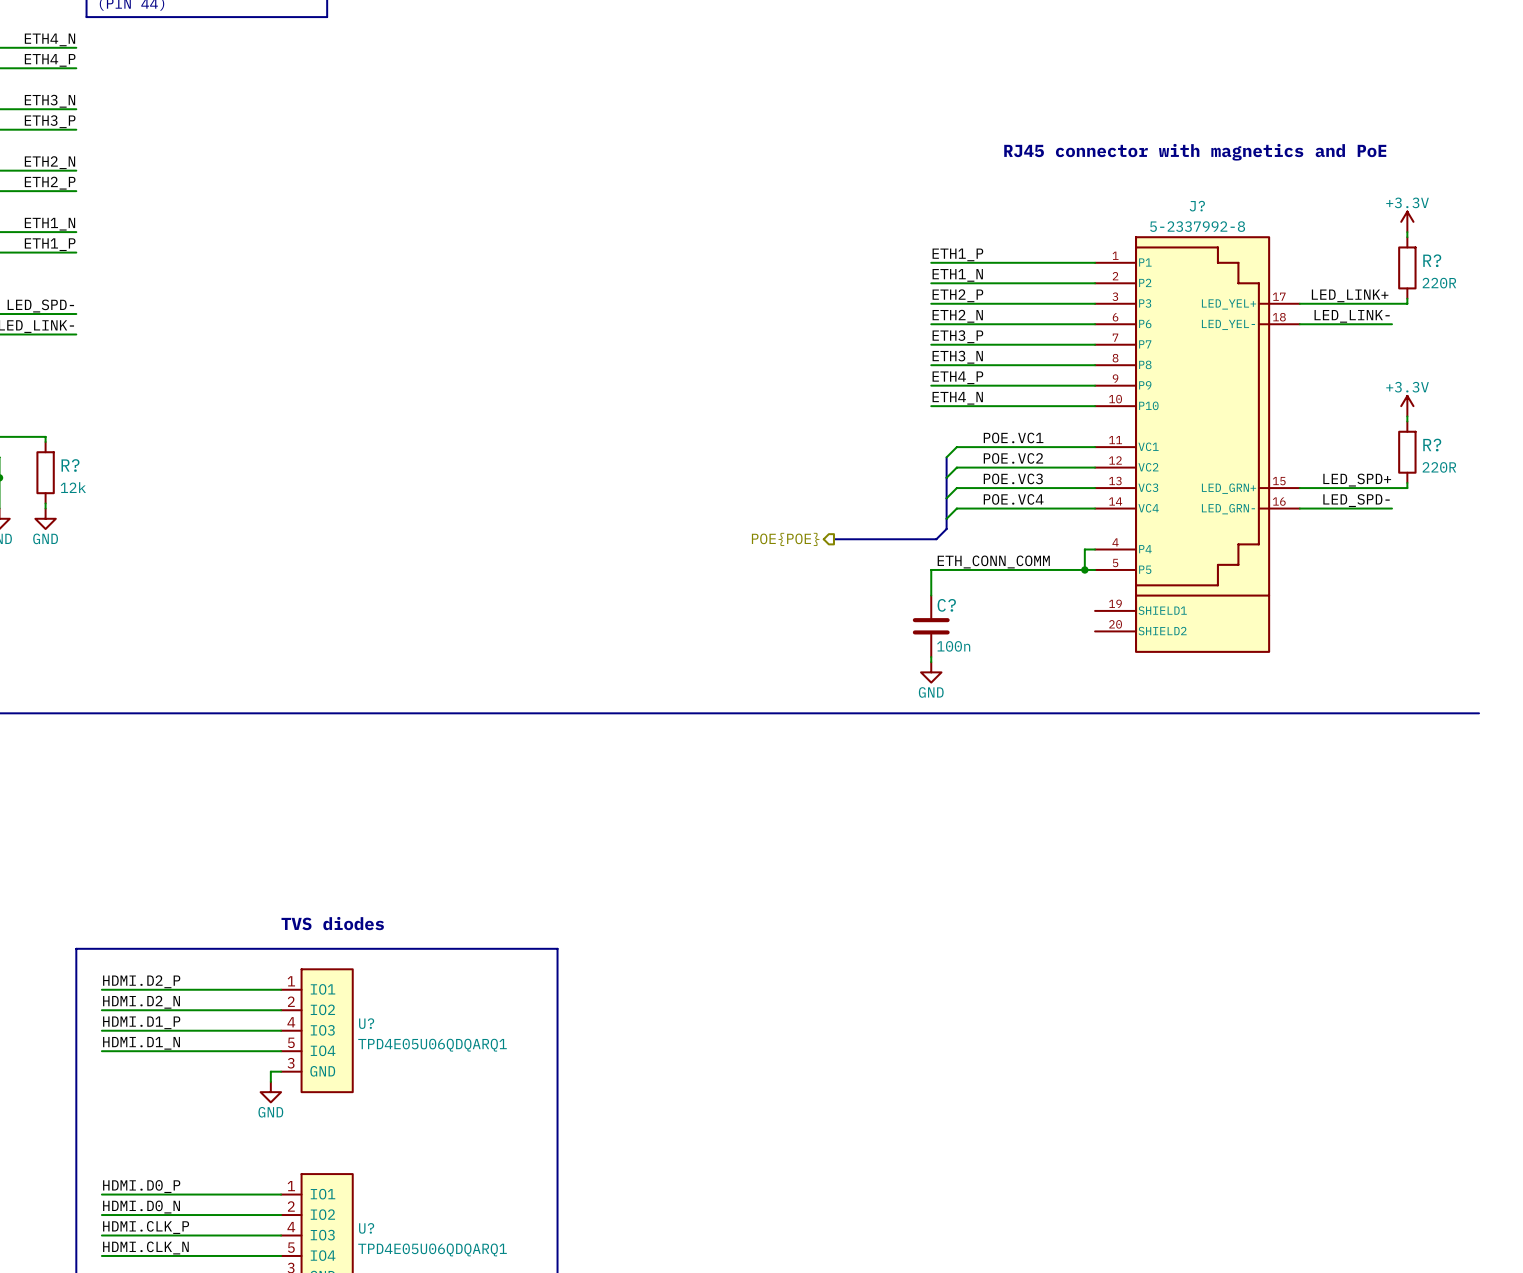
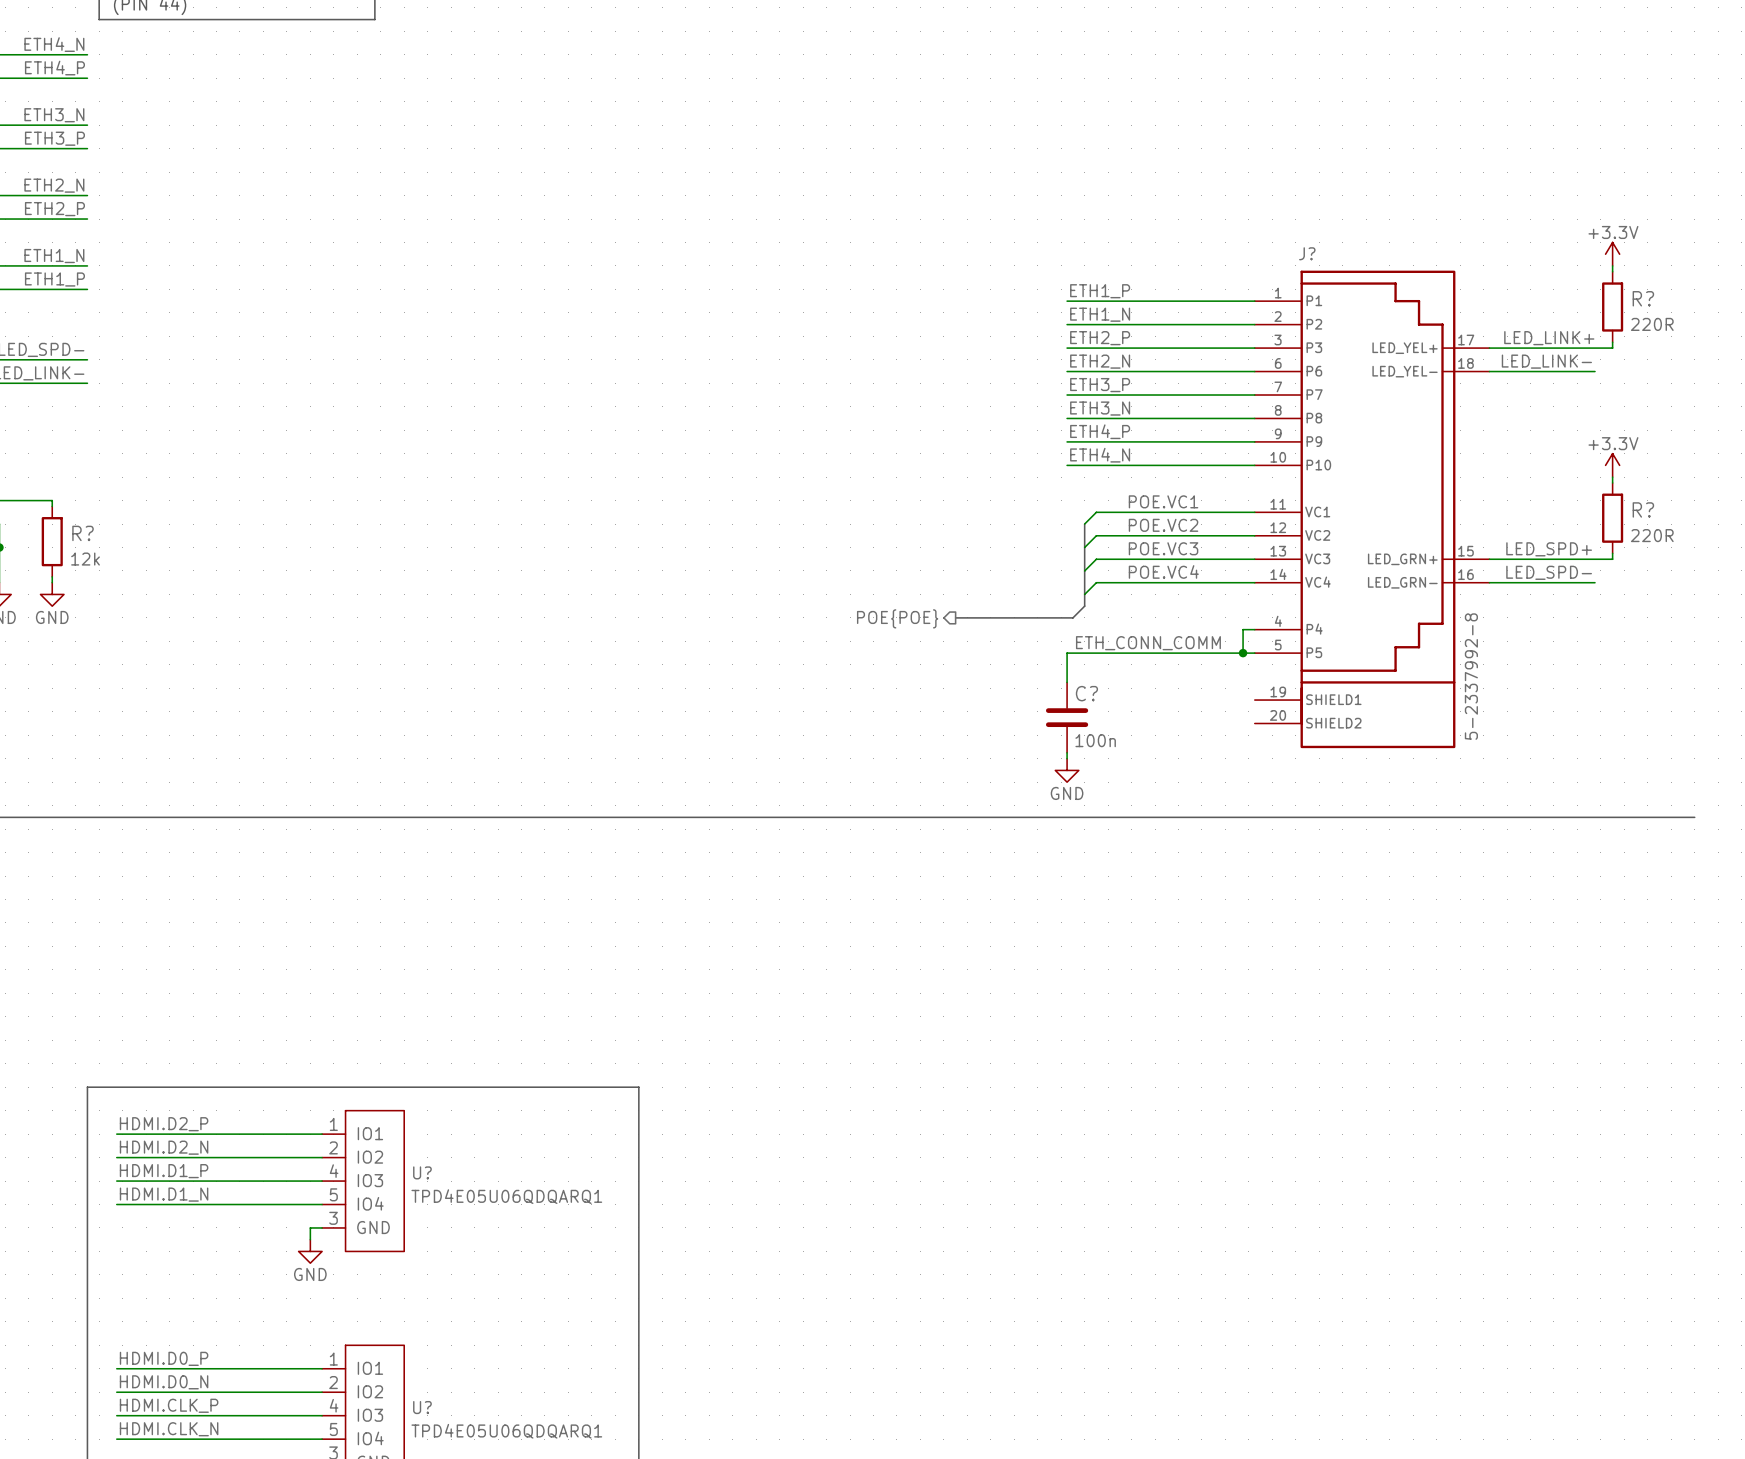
text: RJ45 connector with magnetics and PoE (1195, 152) -> none
J? name position: J? (1197, 206) -> J? (1307, 253)
J? value rotation: 0° (1197, 226) -> 90° counterclockwise (1471, 676)
J? value position: 5-2337992-8 (1197, 226) -> 5-2337992-8 (1471, 676)
text: TVS diodes (332, 923) -> none

